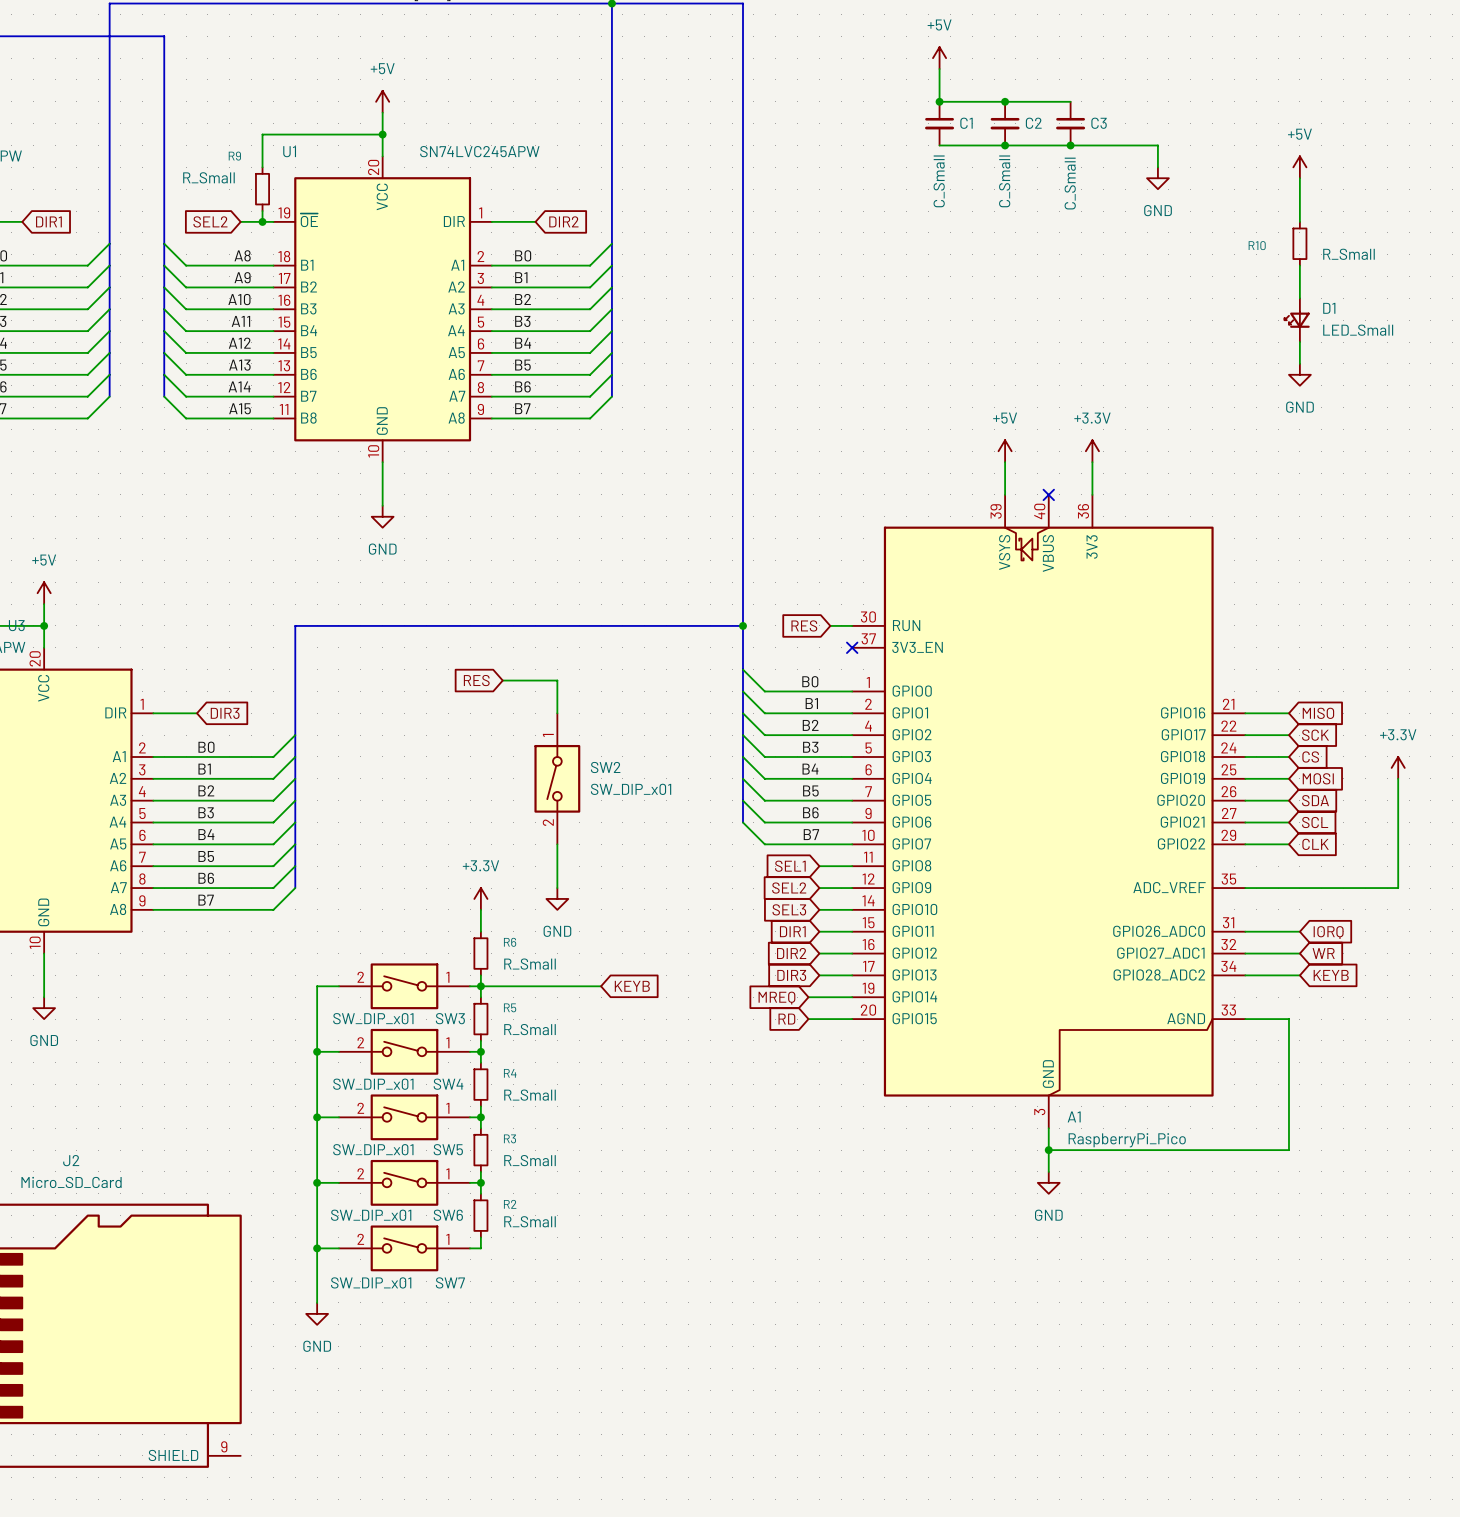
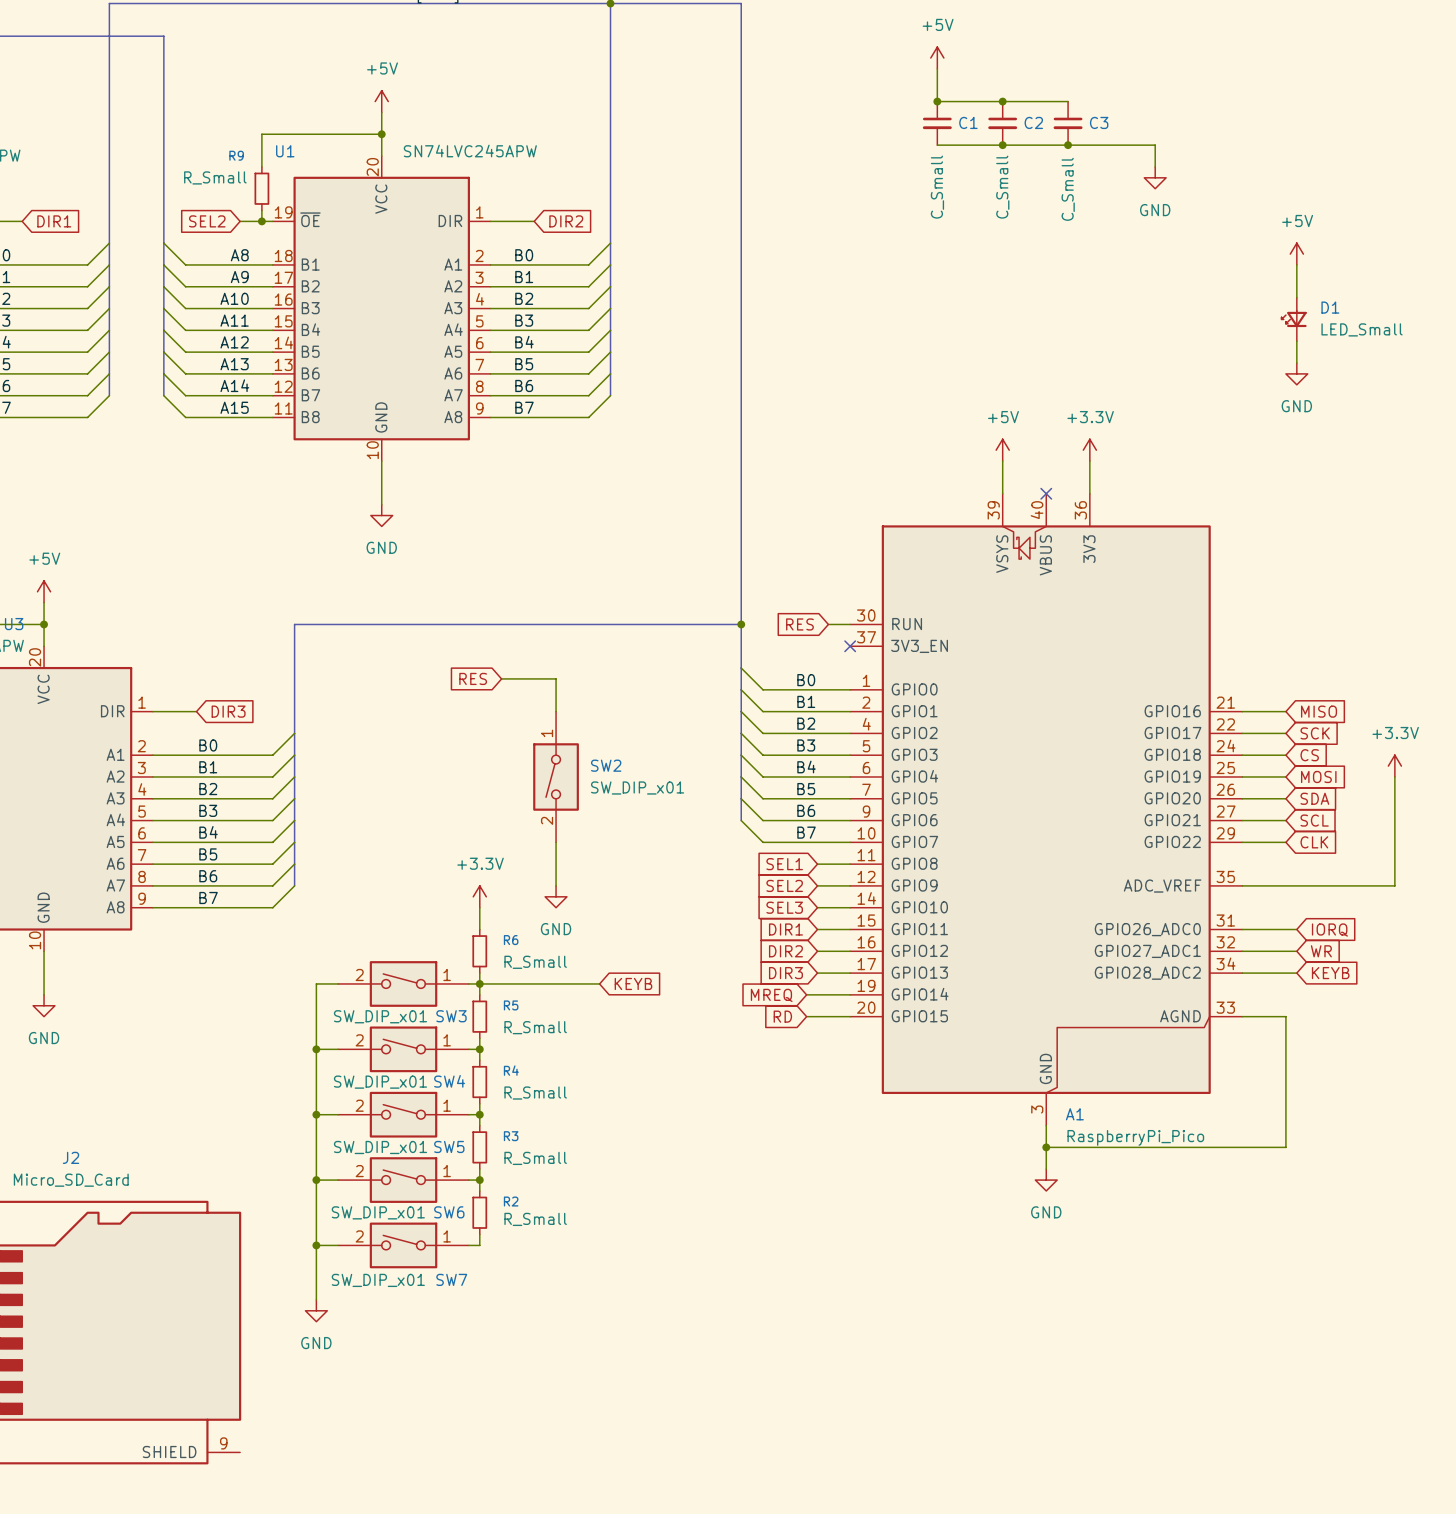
power symbol position: +5V (1299, 167) -> +5V (1296, 254)
wire: (1299, 178) (1299, 221) -> none
R10: R_Small (1299, 243) -> none

